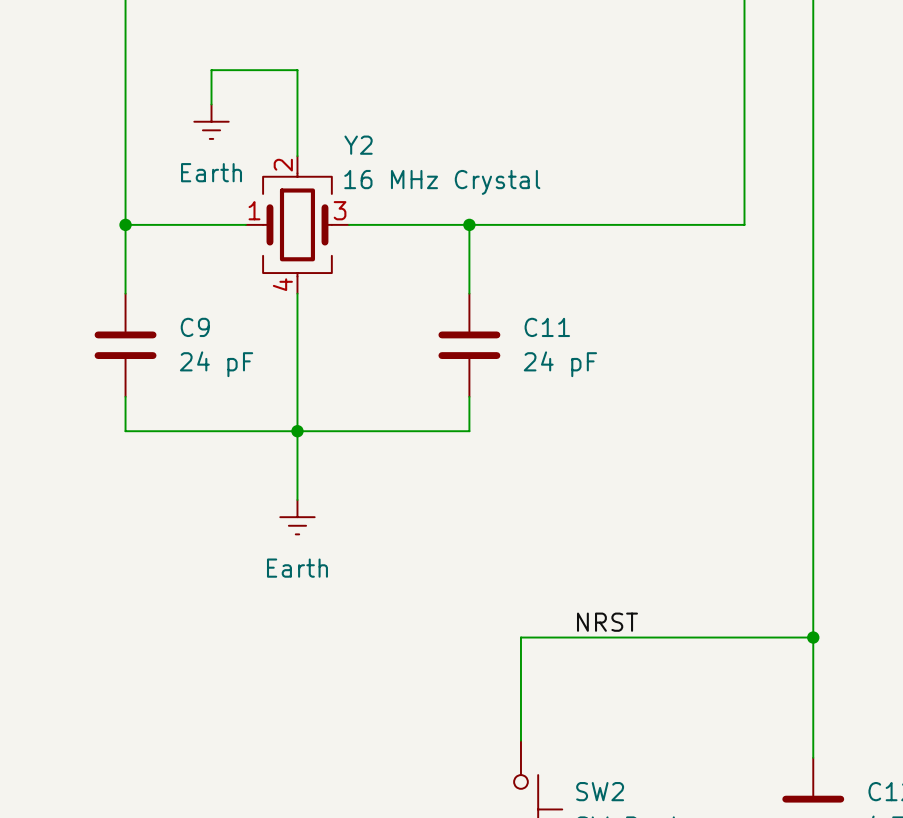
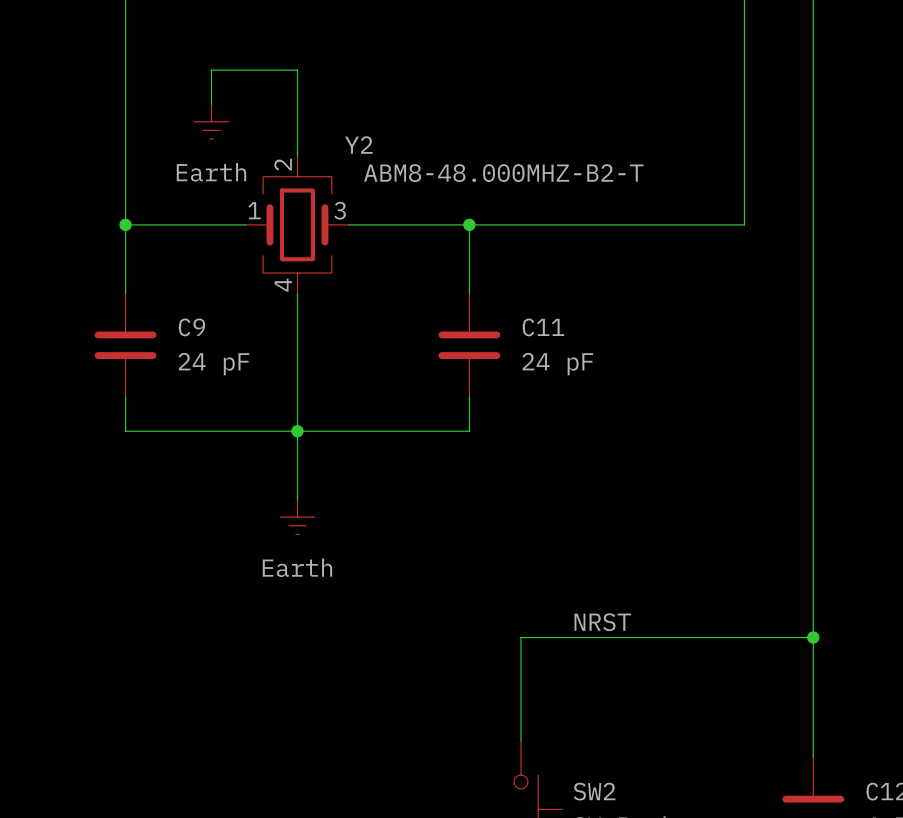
Y2 value: 16 MHz Crystal (442, 182) -> ABM8-48.000MHZ-B2-T (503, 173)

